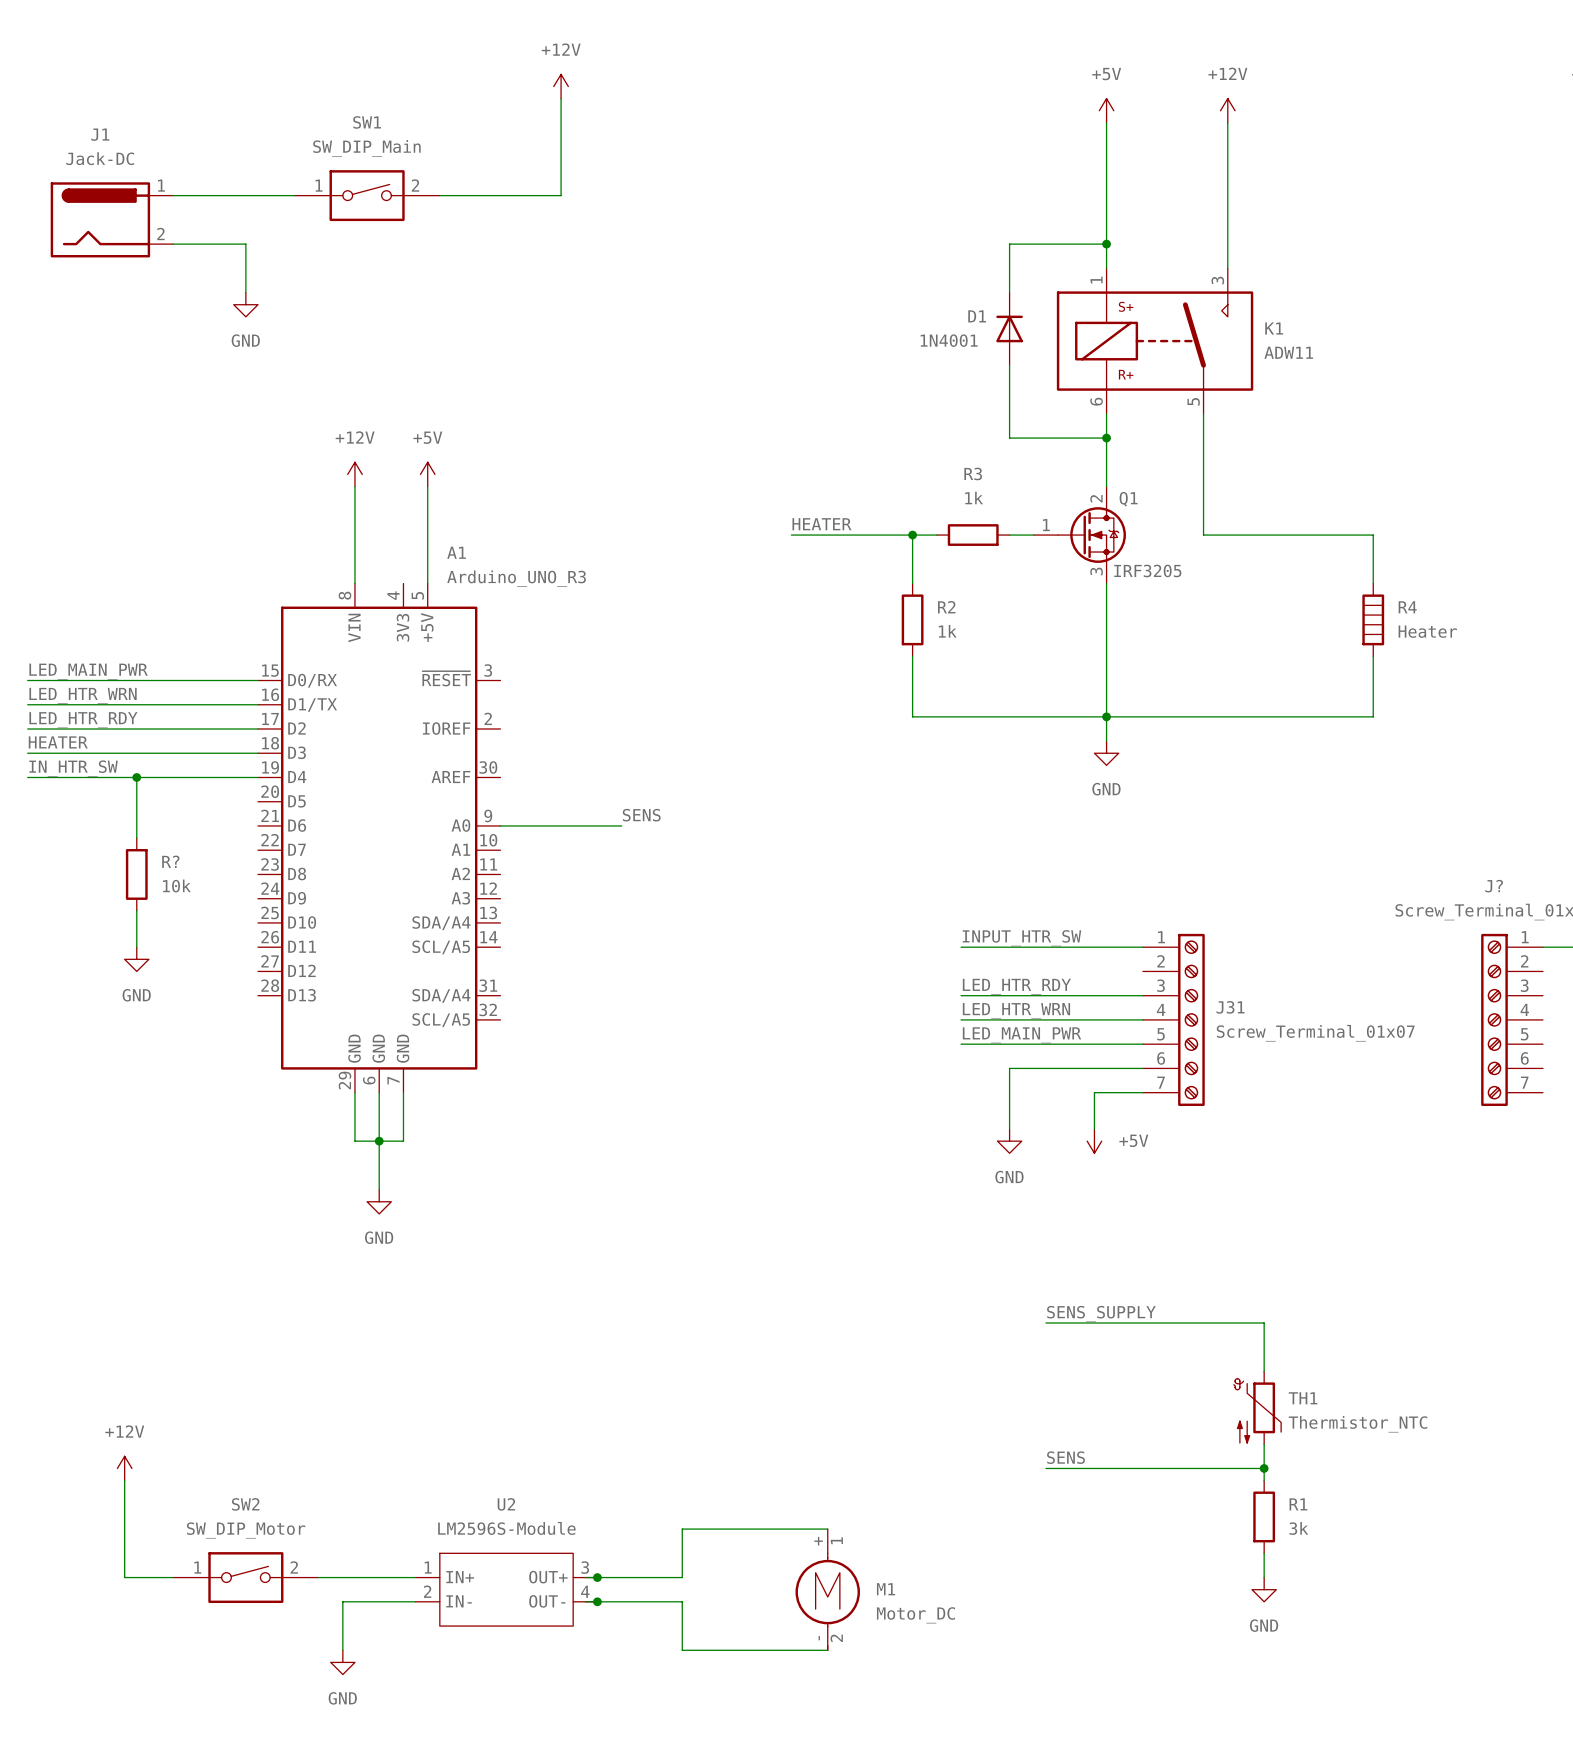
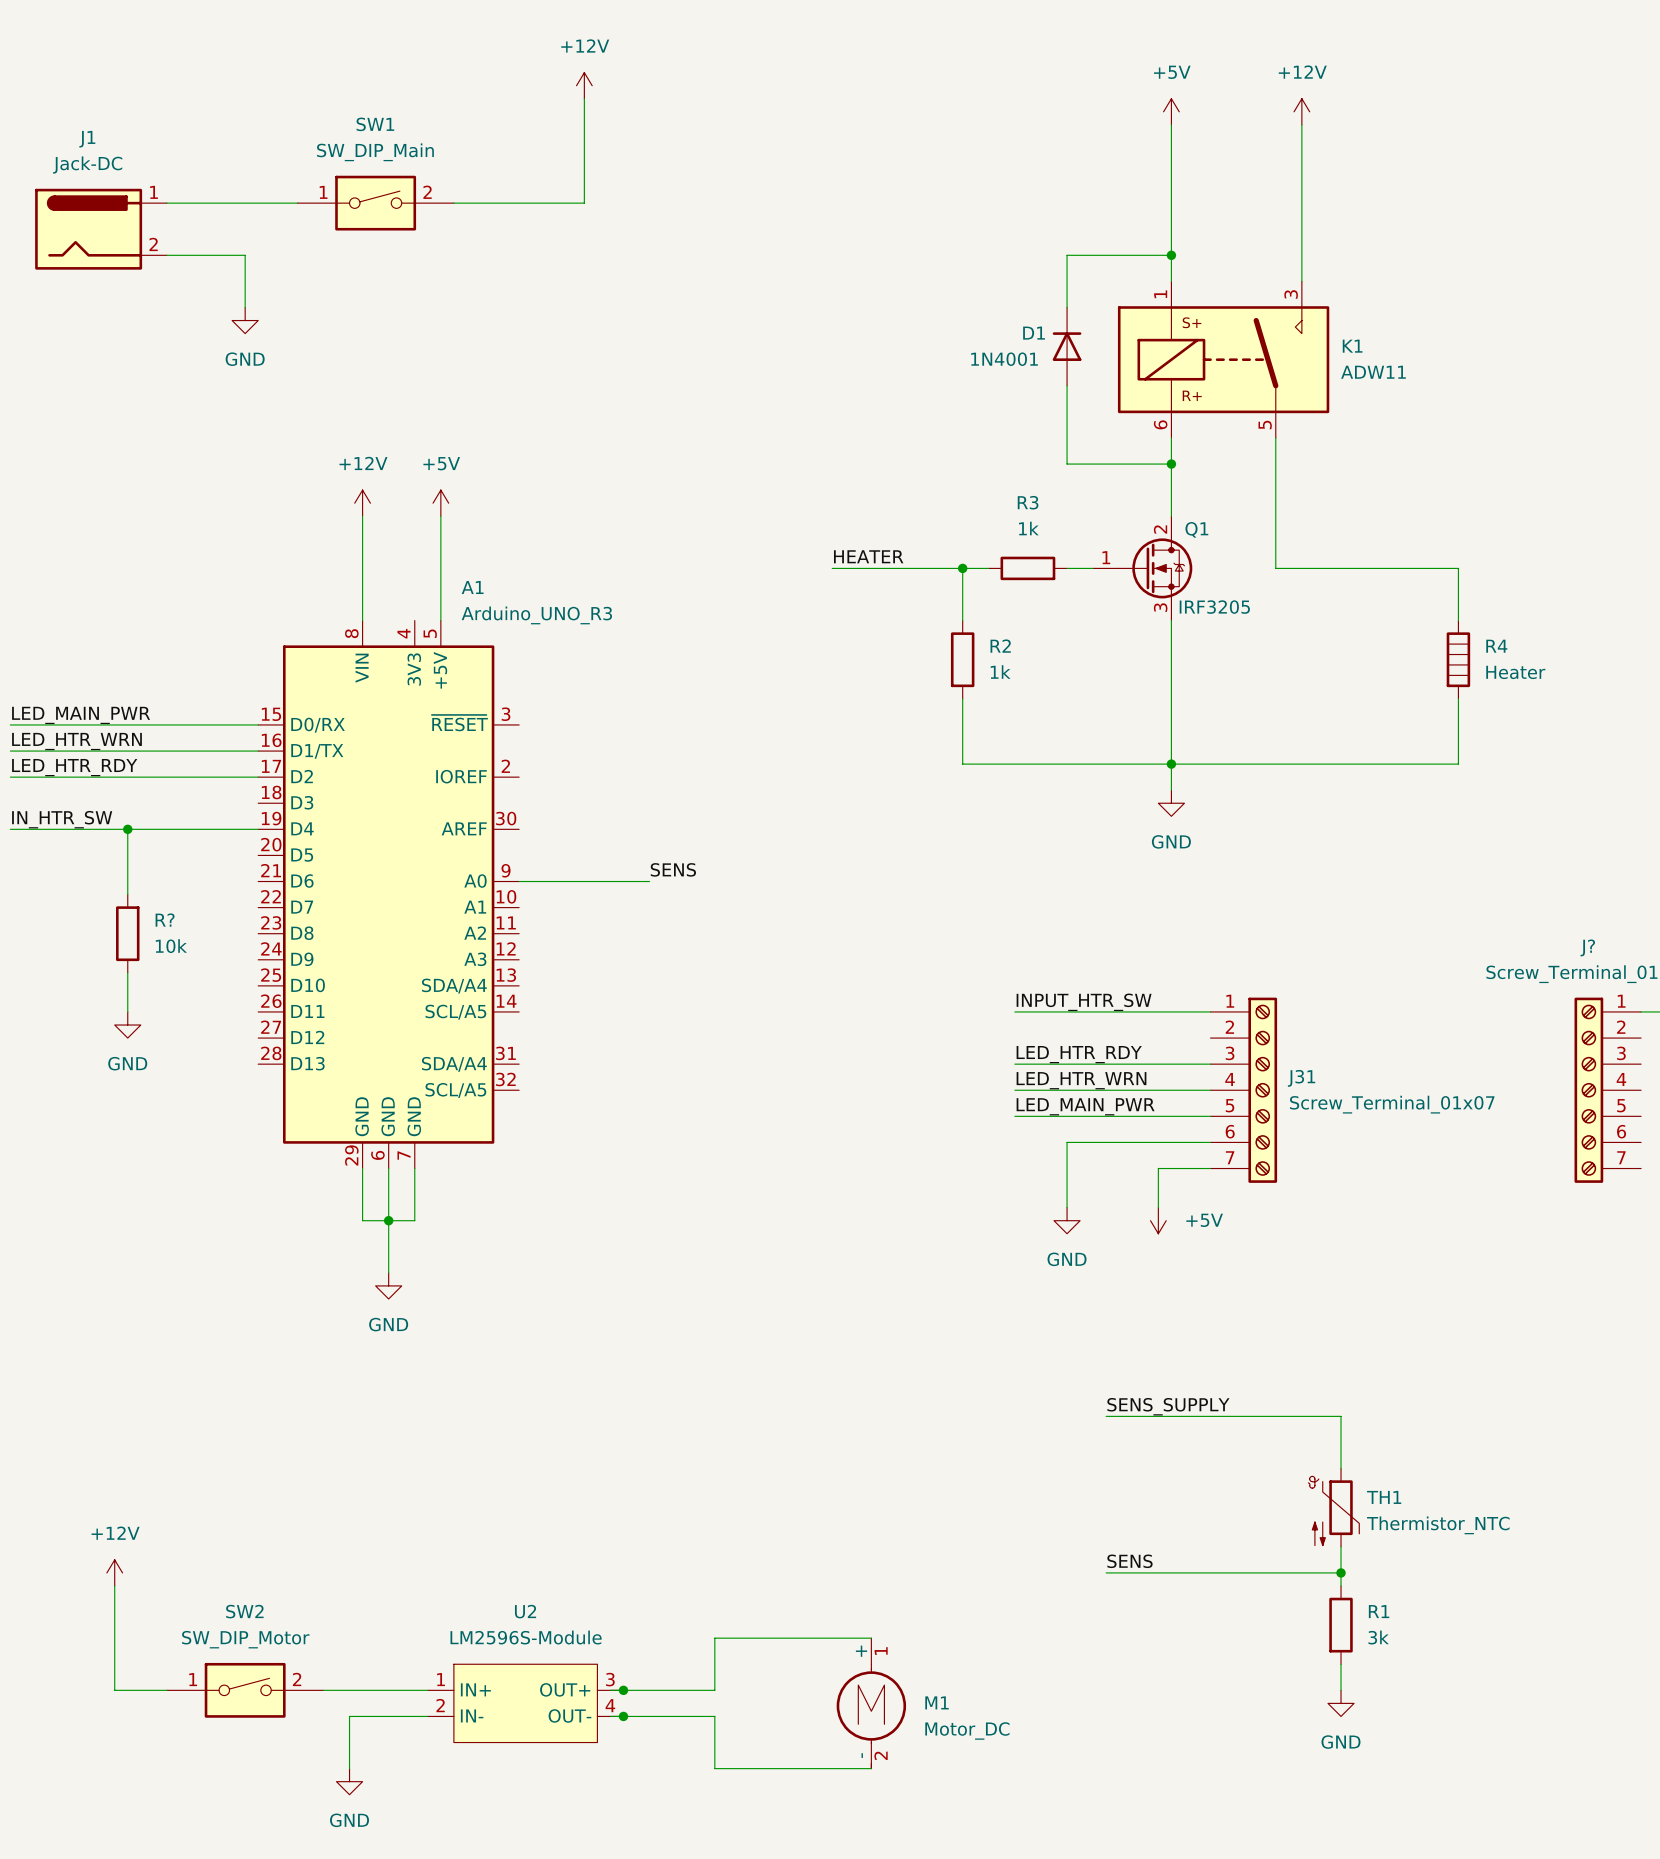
label: HEATER (58, 742) -> none
wire: (27, 753) (258, 753) -> none

